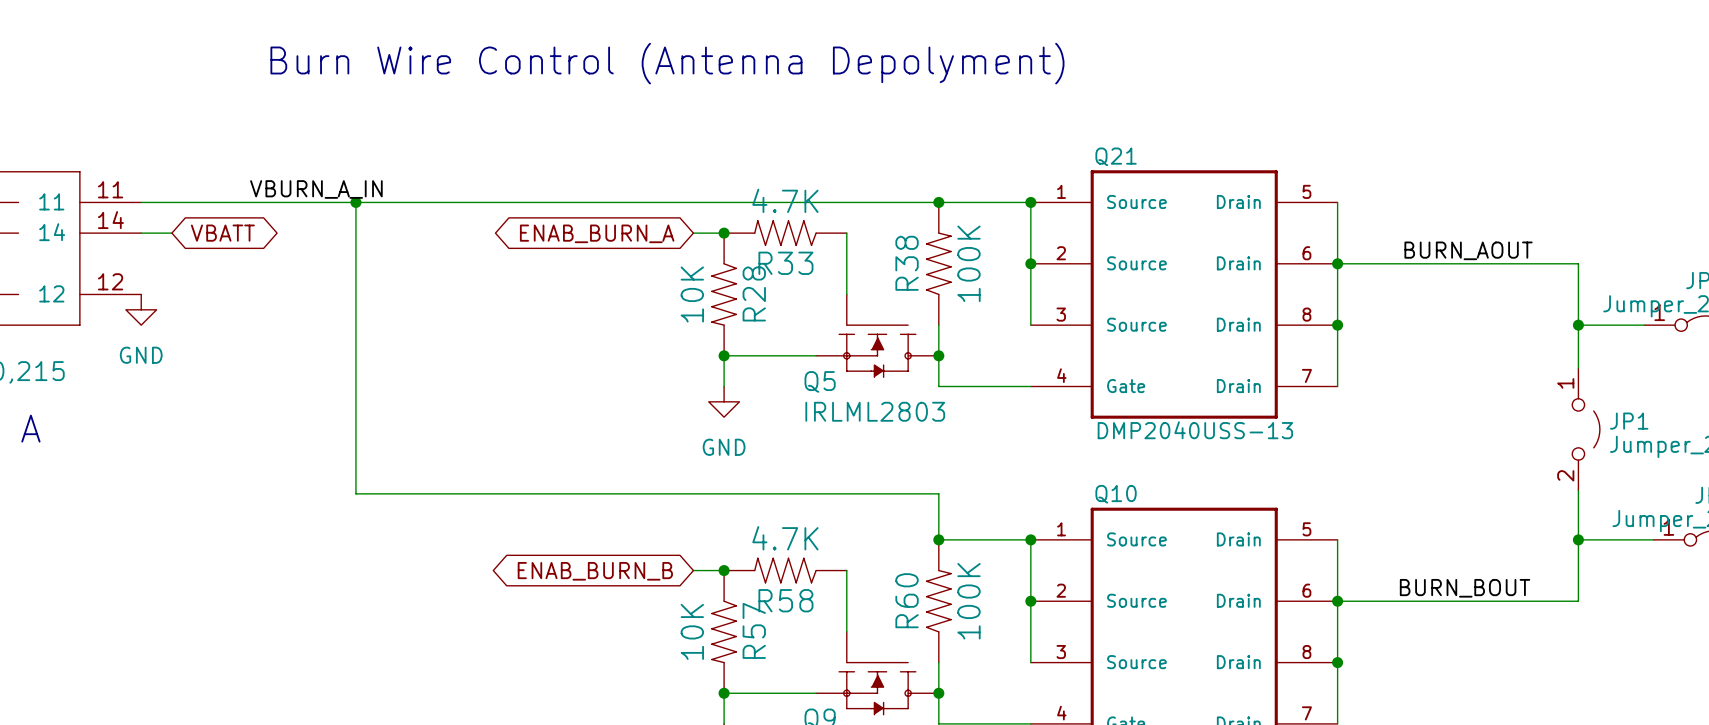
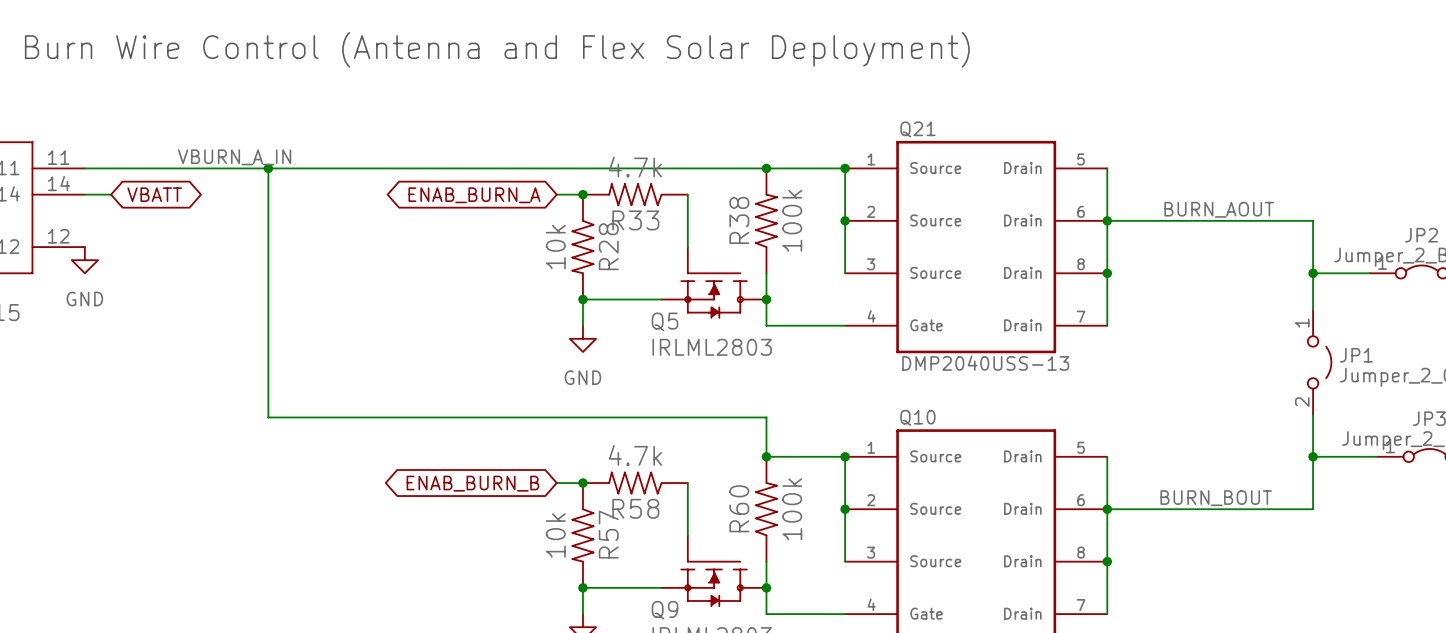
text: Burn Wire Control (Antenna Depolyment) (667, 63) -> Burn Wire Control (Antenna and Flex Solar Deployment) (497, 49)
R33 value: 4.7K (785, 200) -> 4.7k (635, 167)
R38 value: 100K (968, 263) -> 100k (792, 220)
R28 value: 10K (692, 294) -> 10k (555, 247)
R58 value: 4.7K (785, 538) -> 4.7k (635, 455)
R60 value: 100K (968, 601) -> 100k (792, 509)
R57 value: 10K (692, 631) -> 10k (555, 535)

